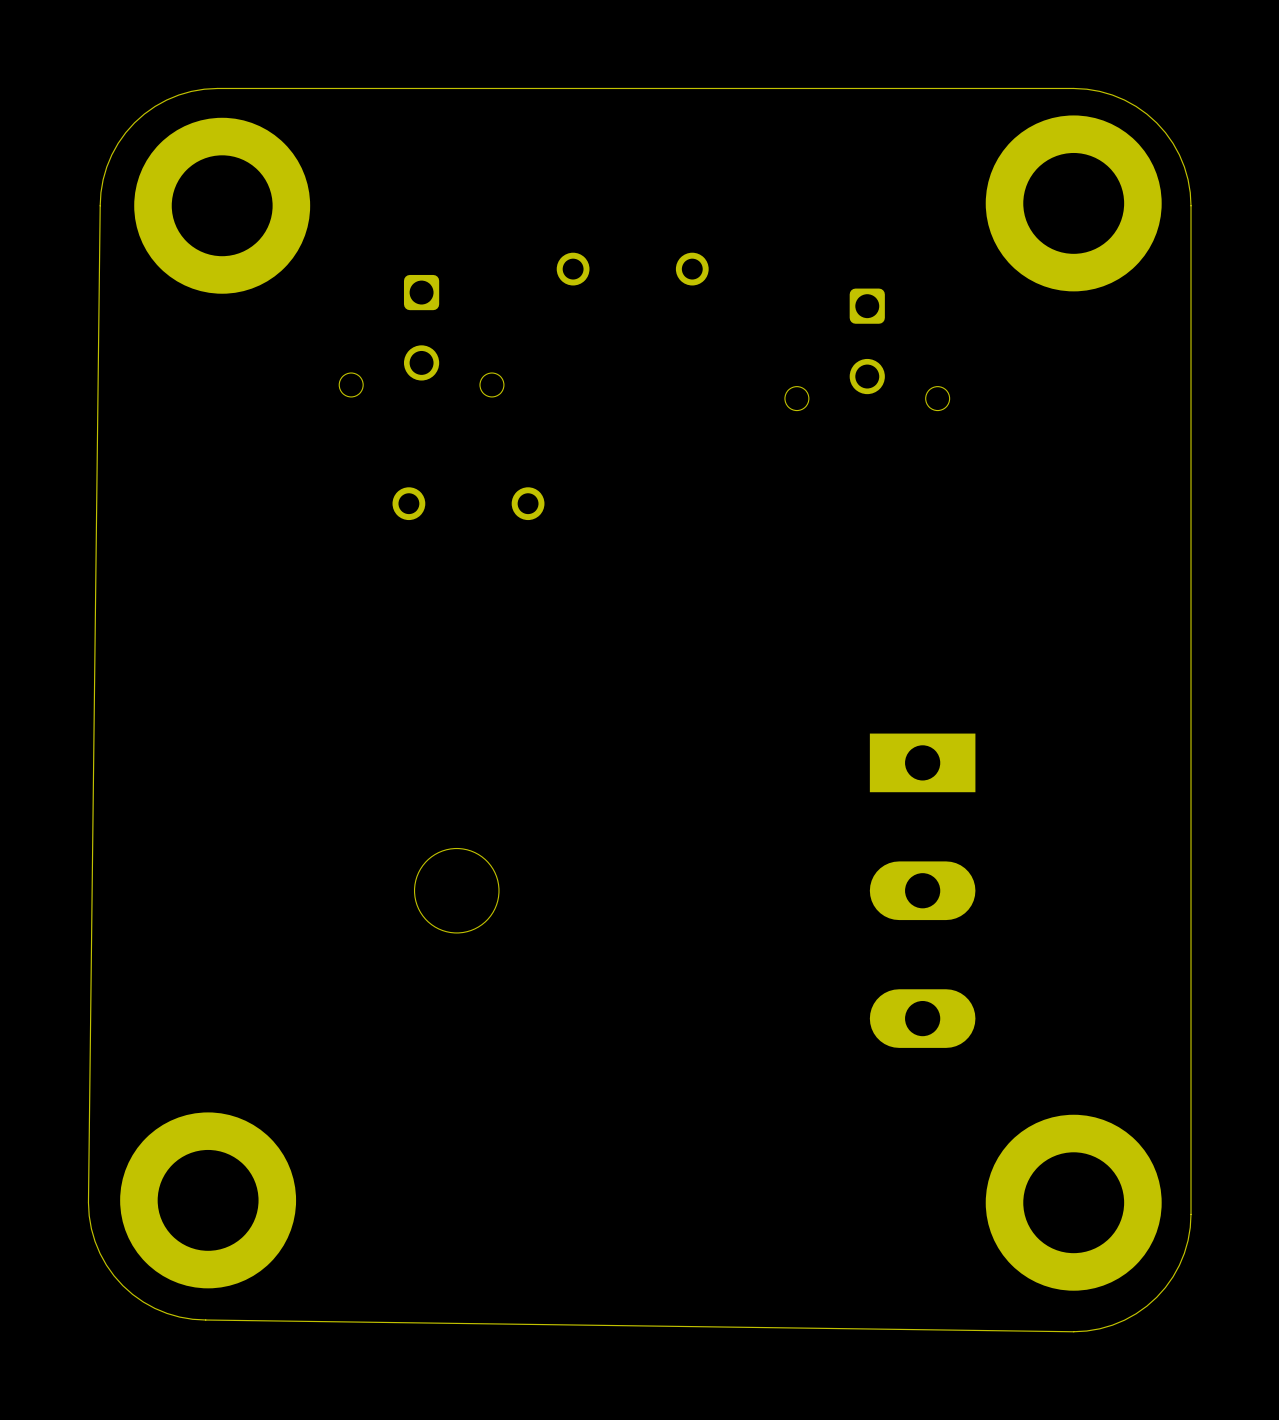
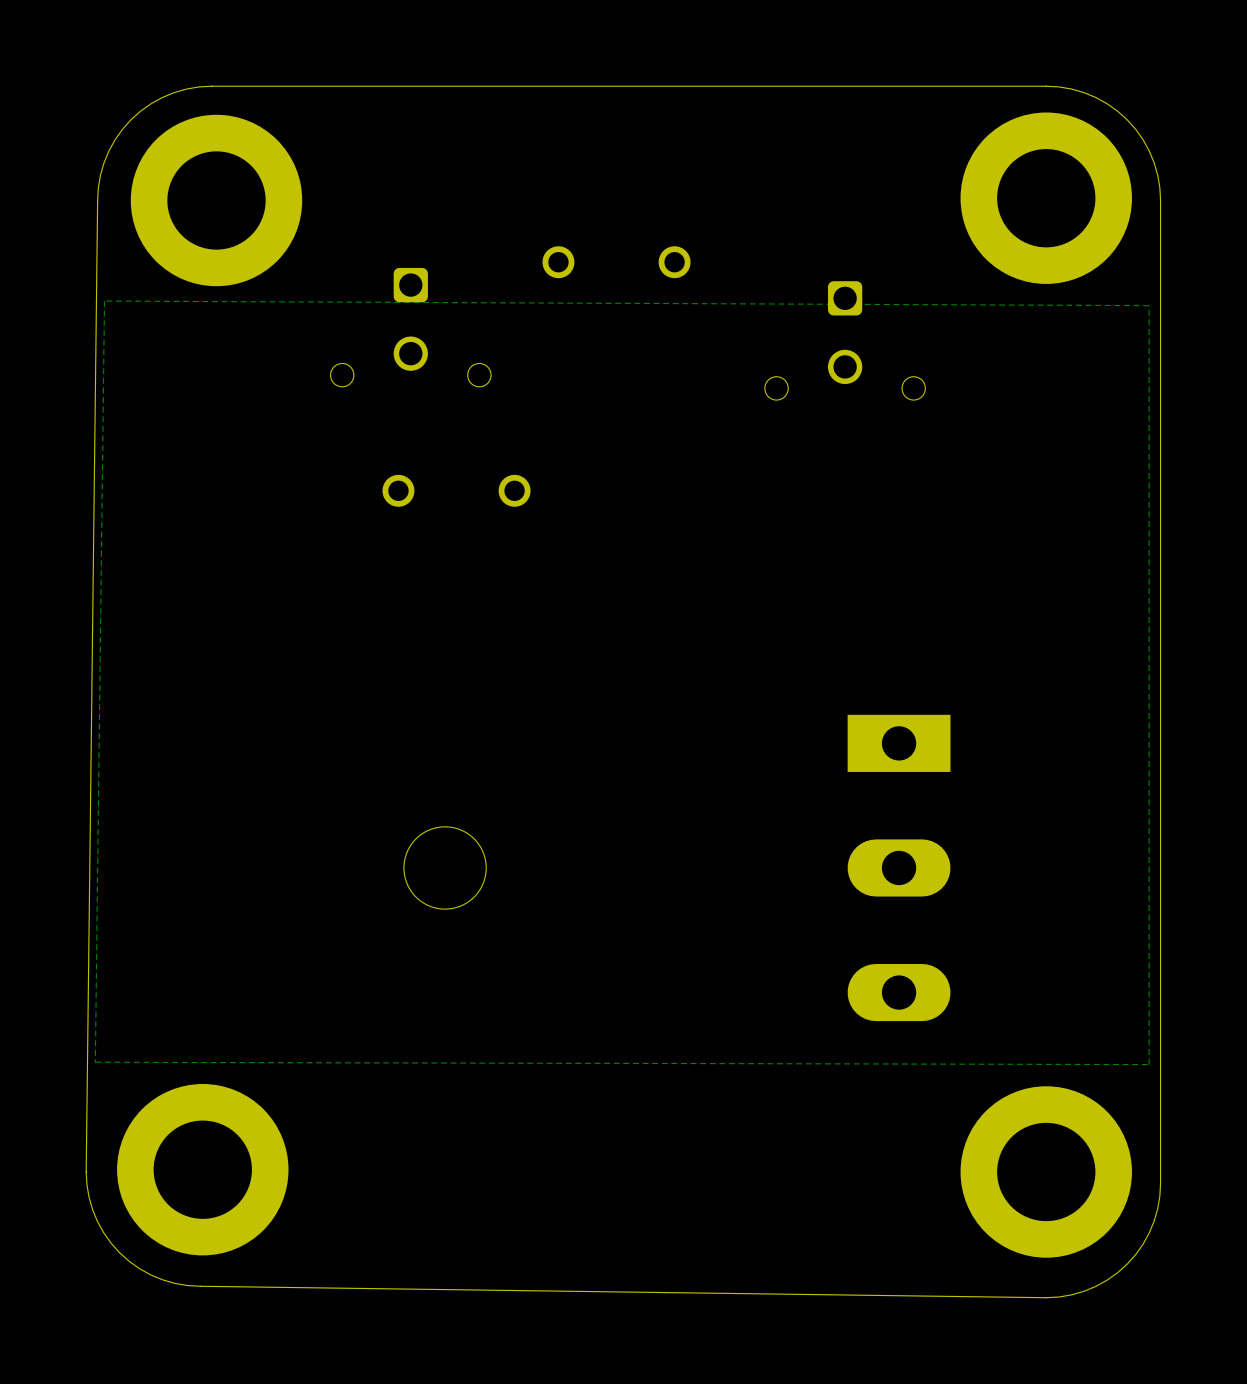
zone outline: none -> (104, 301) (1149, 305) (1149, 1064) (95, 1062) (104, 301)

